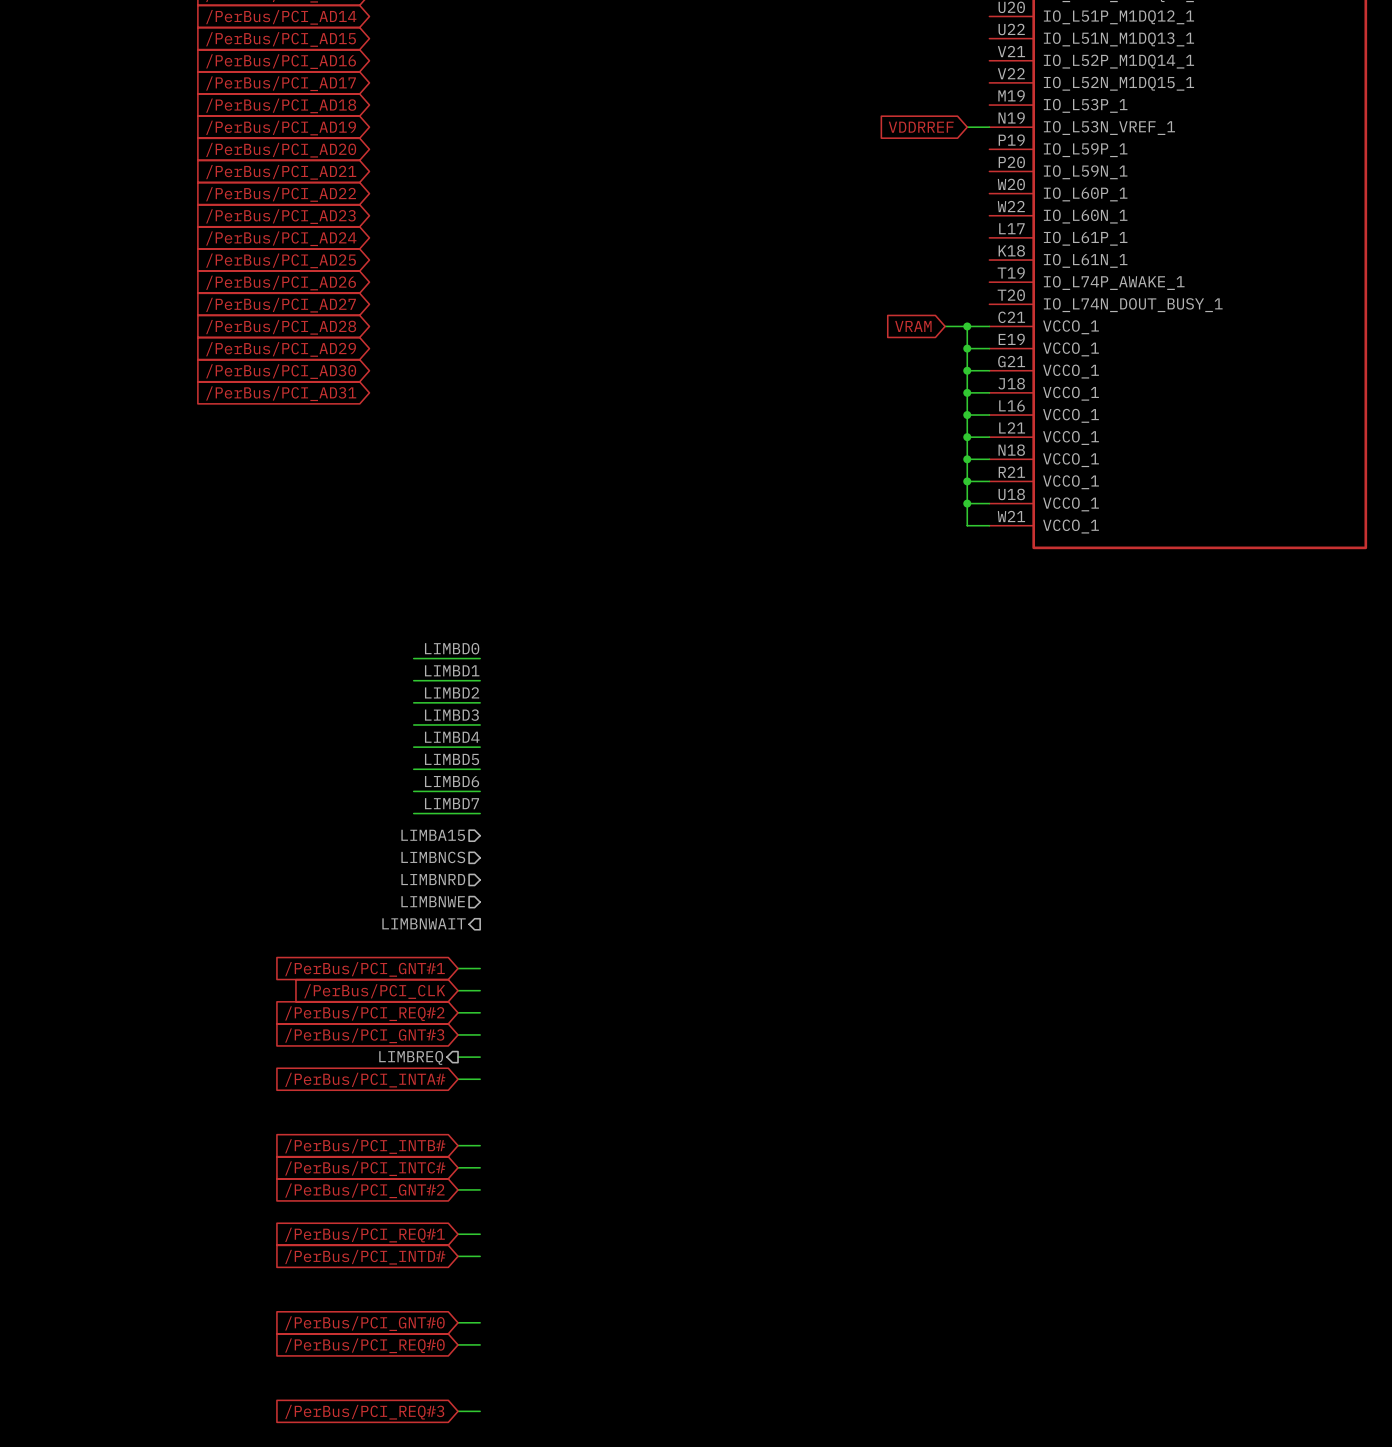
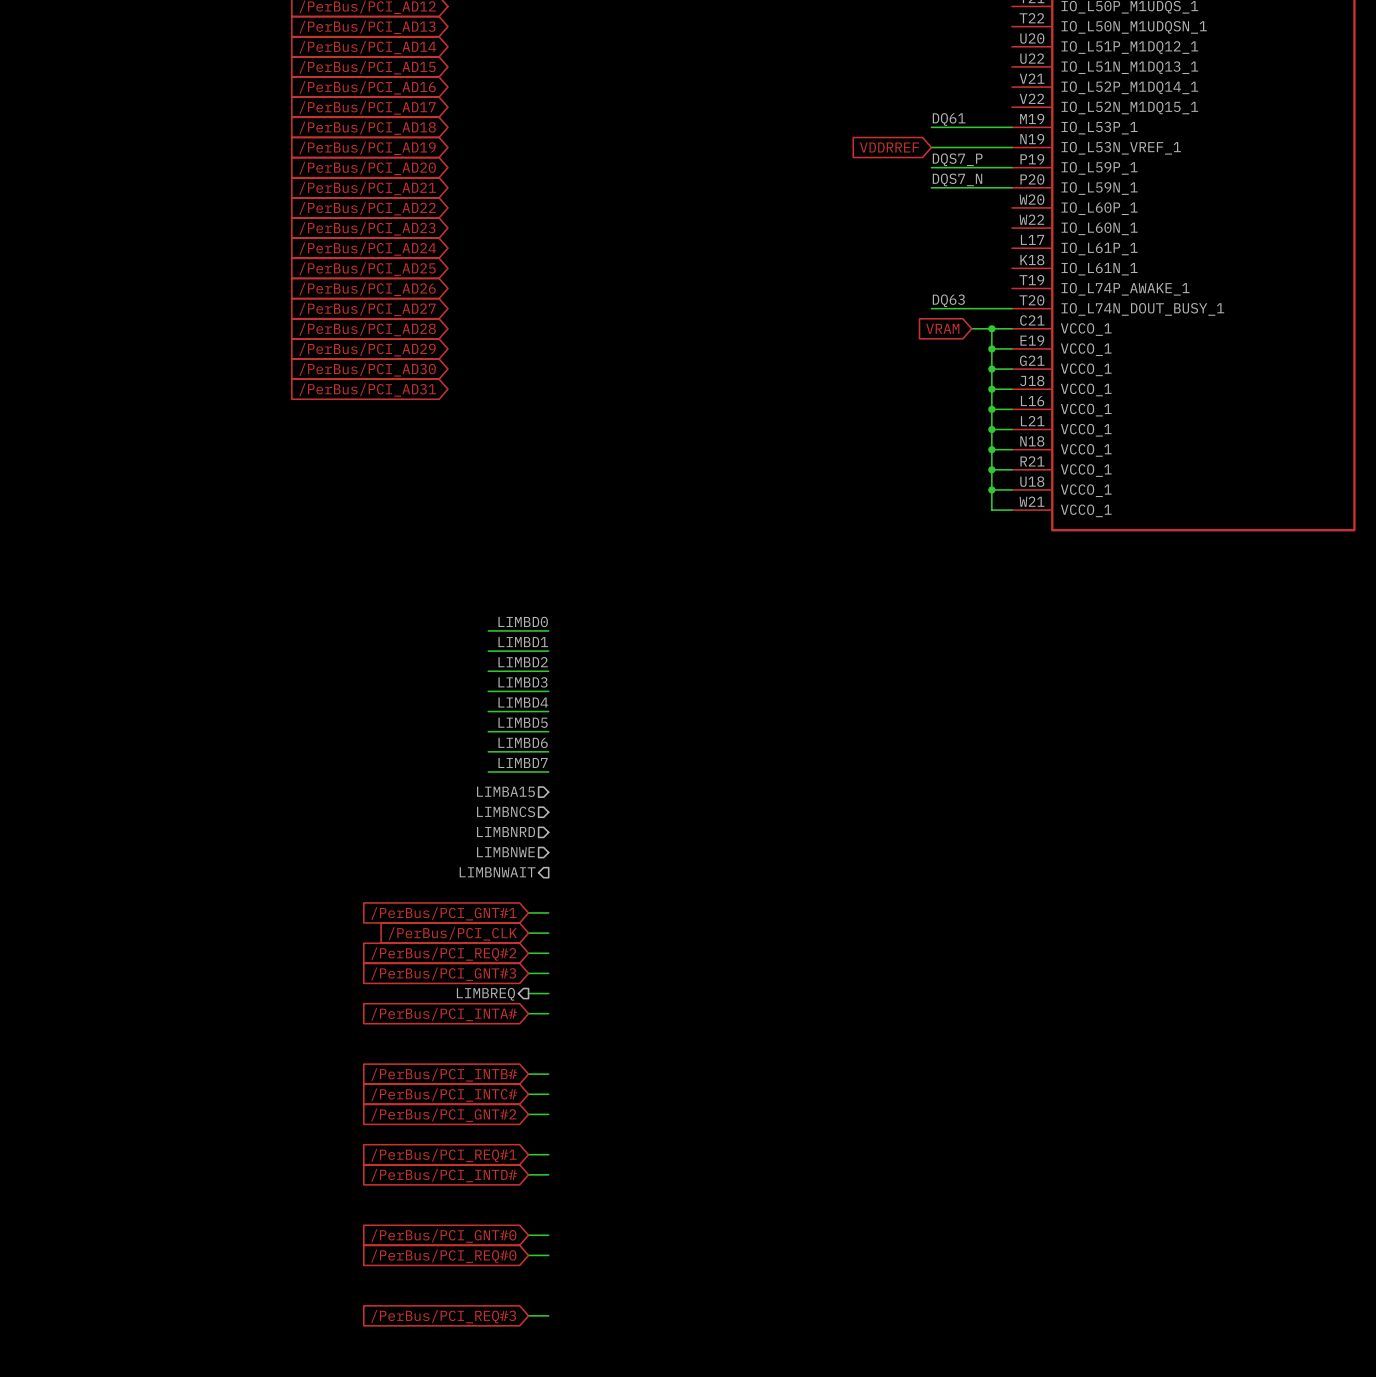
label: none -> DQ61 (949, 119)
wire: none -> (931, 127) (1011, 127)
wire: none -> (931, 147) (991, 147)
global label position: VDDRREF (921, 127) -> VDDRREF (889, 147)
label: none -> DQS7_P (957, 159)
wire: none -> (931, 167) (1011, 167)
label: none -> DQS7_N (957, 179)
wire: none -> (931, 187) (1011, 187)
label: none -> DQ63 (948, 300)
wire: none -> (931, 308) (1011, 308)

